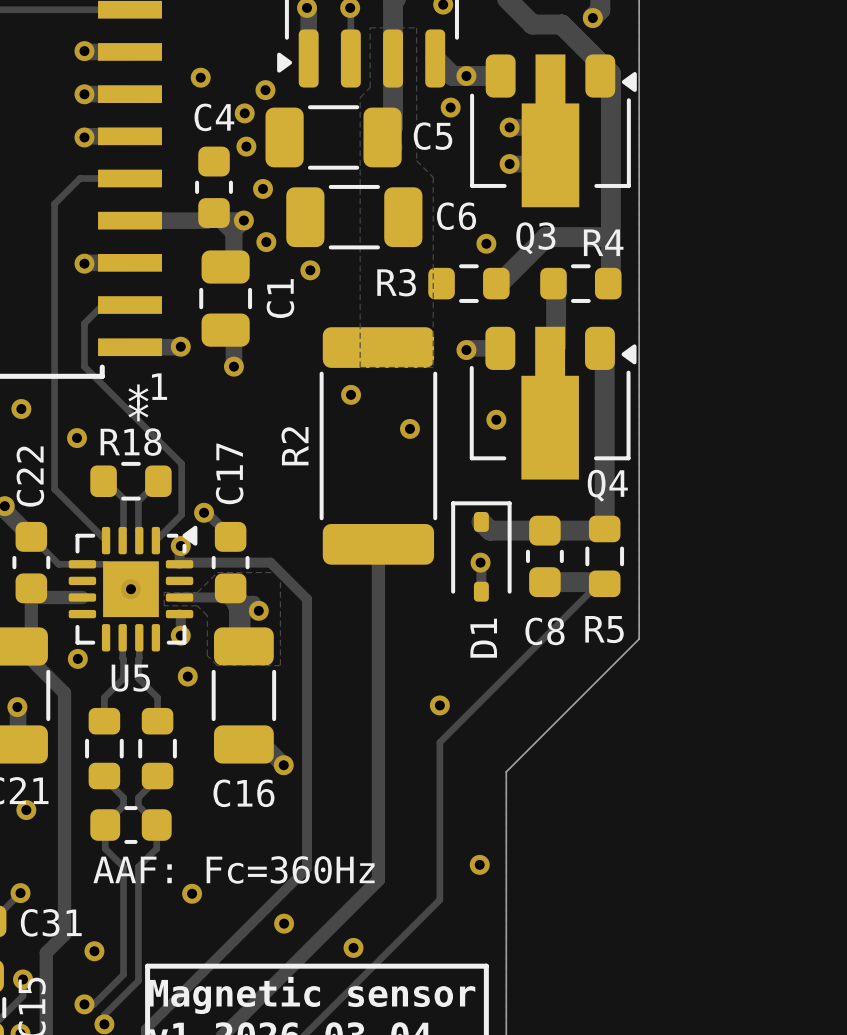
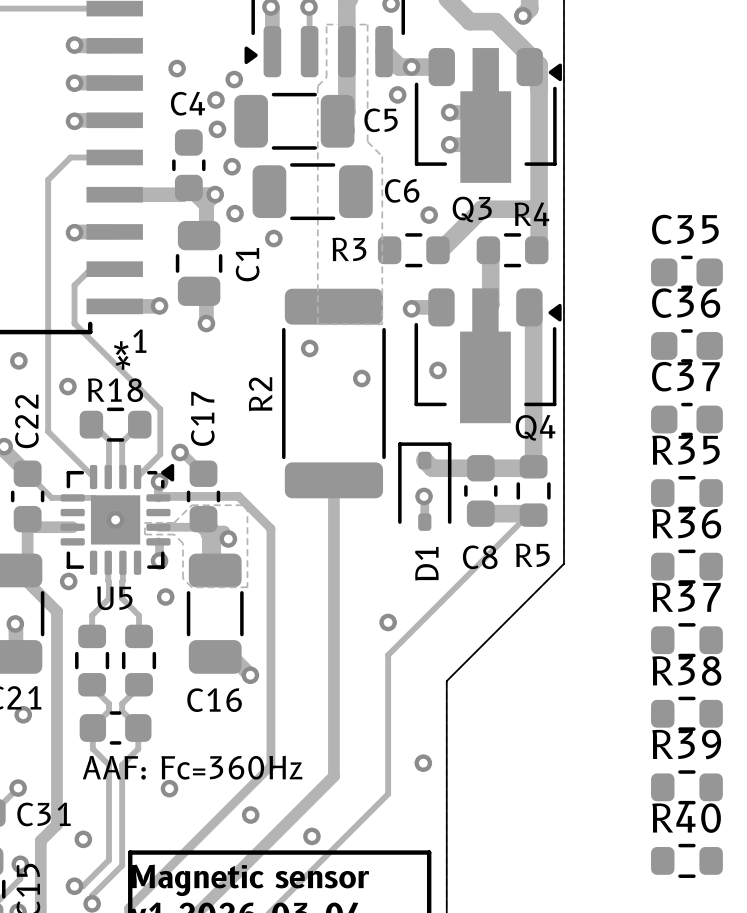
C35: none -> (686, 272)
C36: none -> (686, 345)
C37: none -> (686, 419)
R35: none -> (686, 493)
R36: none -> (686, 566)
R37: none -> (686, 640)
R38: none -> (686, 713)
R39: none -> (686, 787)
R40: none -> (686, 860)

